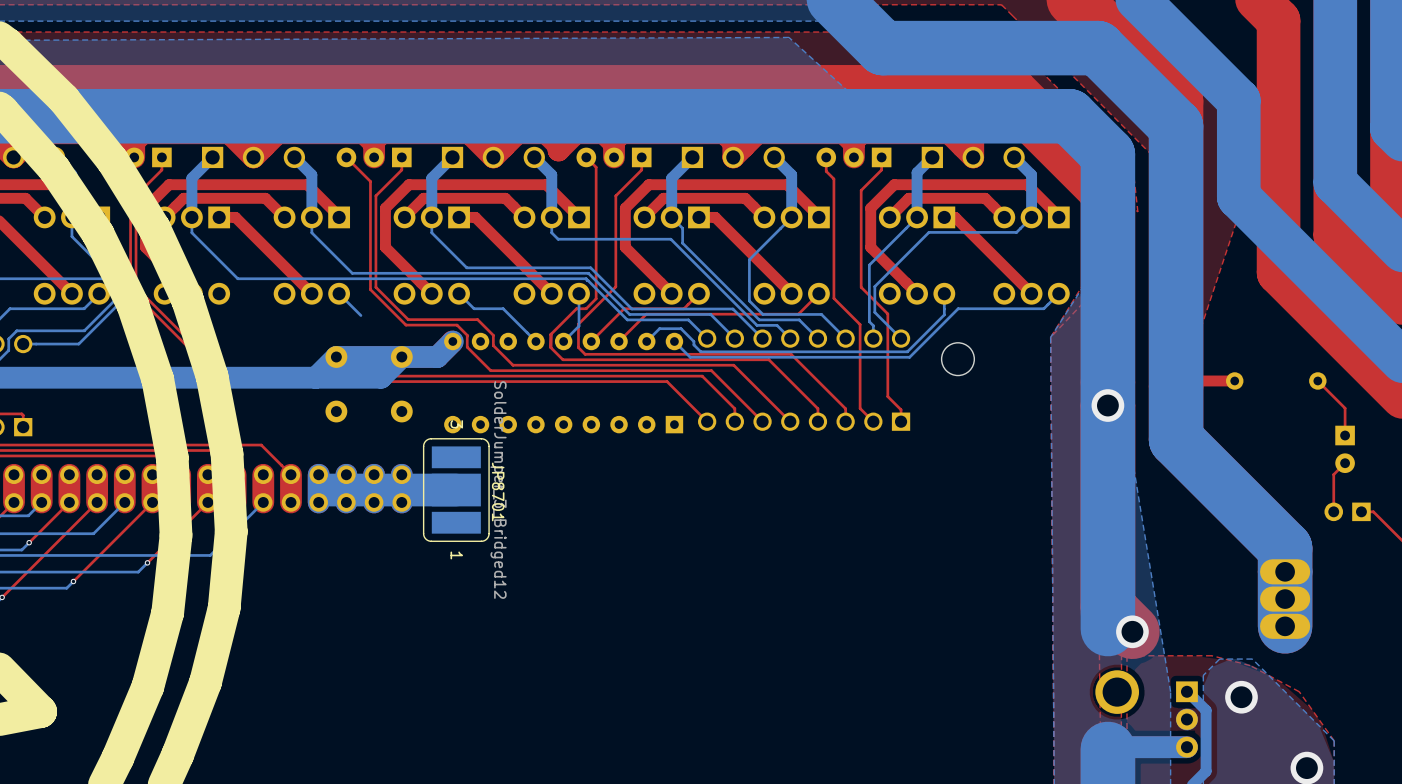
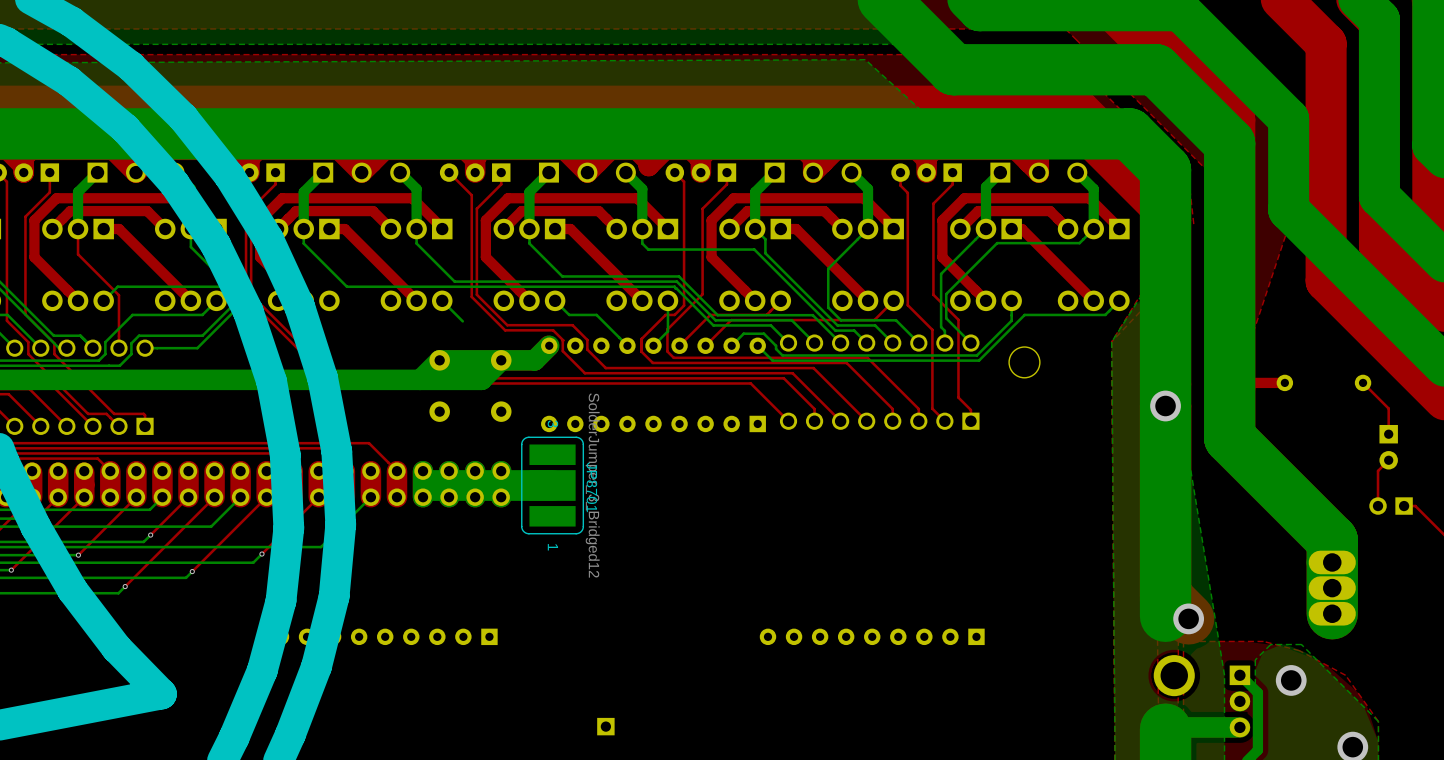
part: none -> (385, 636)
part: none -> (872, 636)
part: none -> (605, 726)

